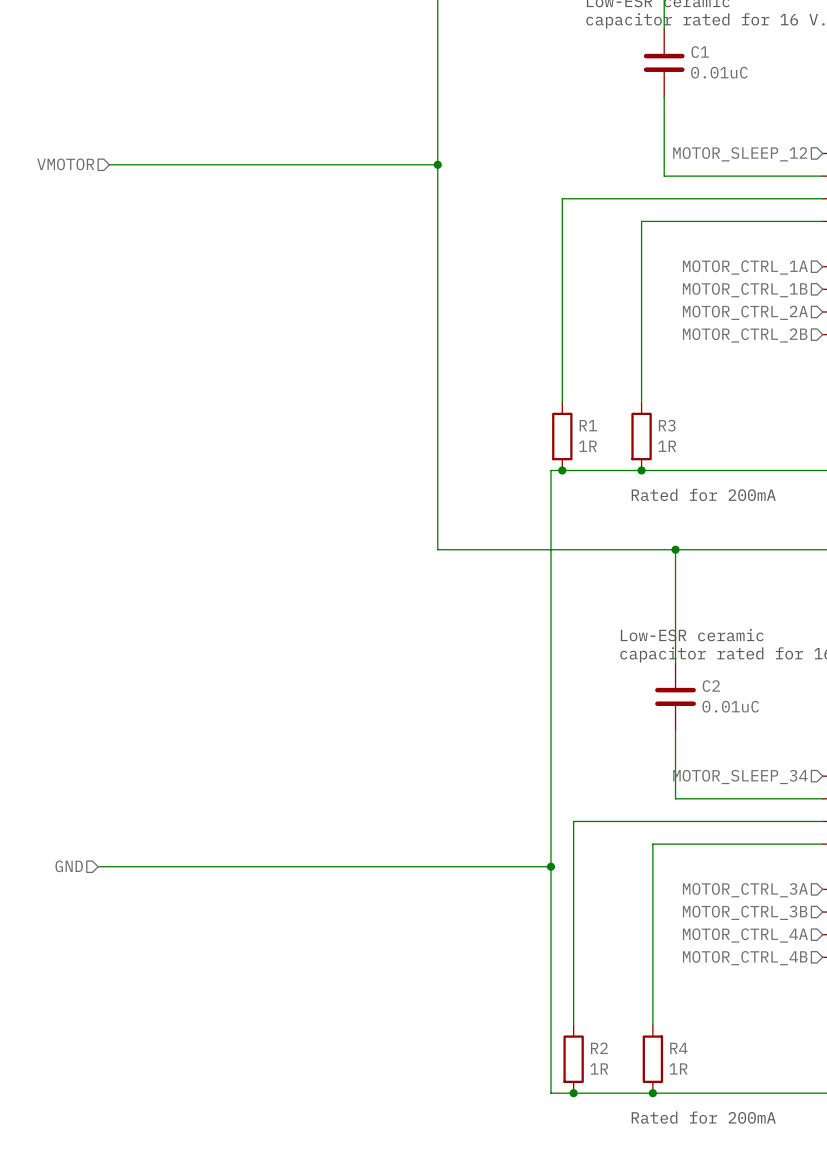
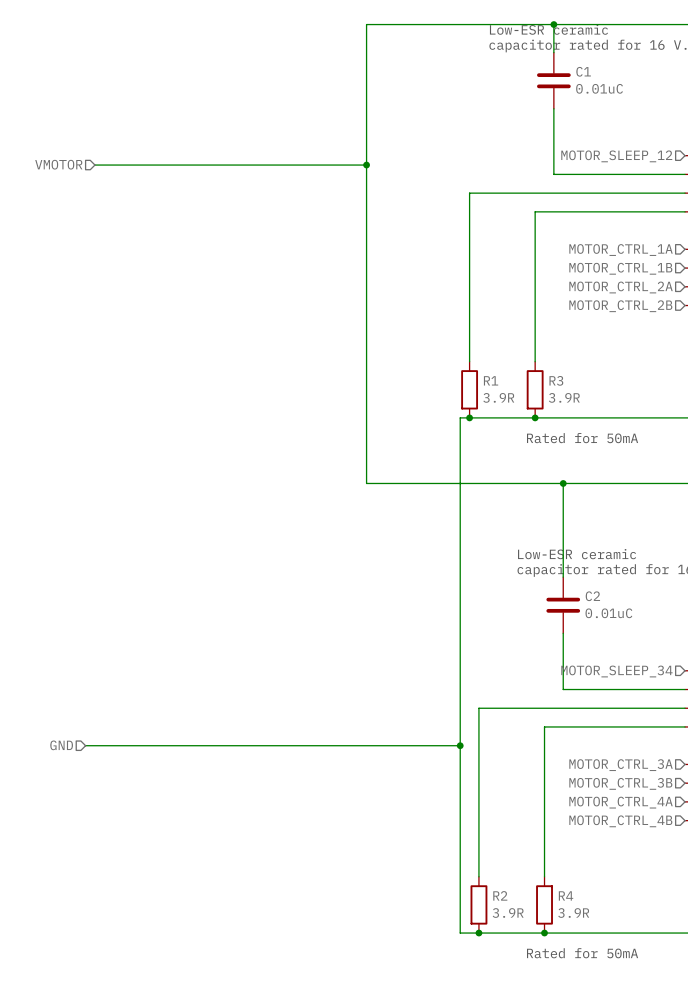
R1 value: 1R (587, 446) -> 3.9R (498, 397)
R3 value: 1R (667, 446) -> 3.9R (564, 397)
text: Rated for 200mA (703, 494) -> Rated for 50mA (582, 438)
R2 value: 1R (599, 1068) -> 3.9R (508, 913)
R4 value: 1R (678, 1068) -> 3.9R (573, 913)
text: Rated for 200mA (703, 1117) -> Rated for 50mA (582, 953)

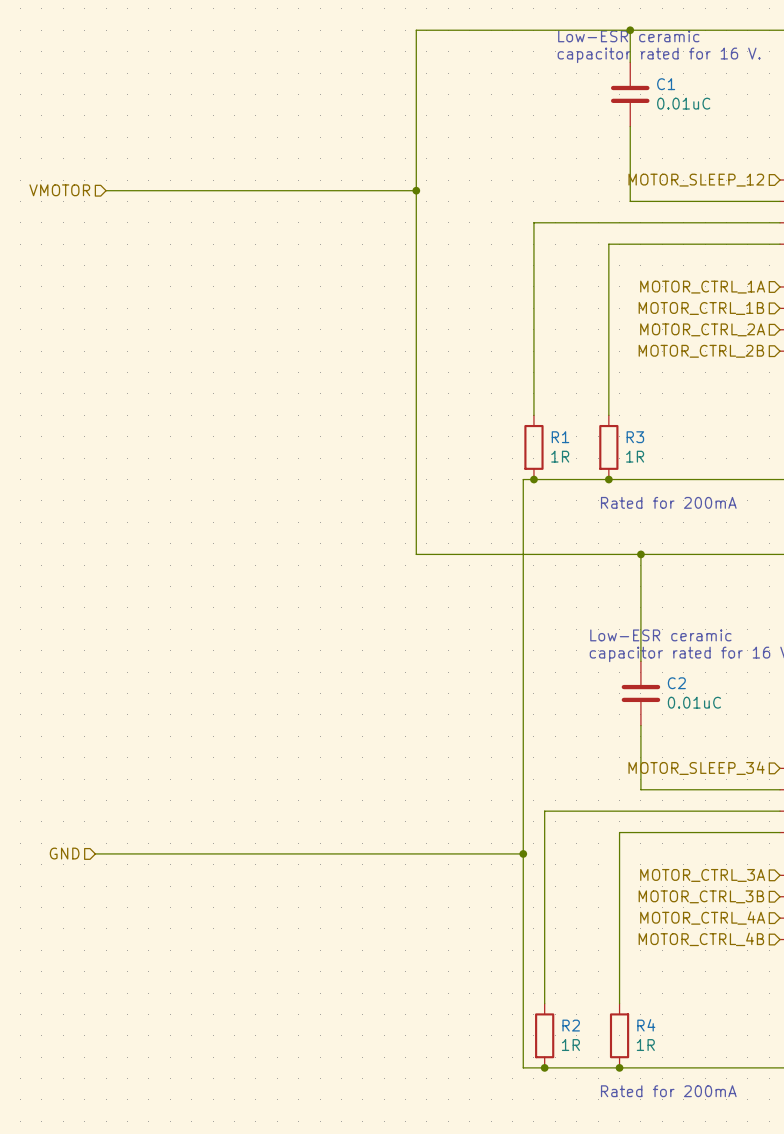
R1 value: 3.9R (498, 397) -> 1R (560, 456)
R3 value: 3.9R (564, 397) -> 1R (635, 456)
text: Rated for 50mA (582, 438) -> Rated for 200mA (668, 502)
R2 value: 3.9R (508, 913) -> 1R (570, 1045)
R4 value: 3.9R (573, 913) -> 1R (645, 1045)
text: Rated for 50mA (582, 953) -> Rated for 200mA (668, 1091)

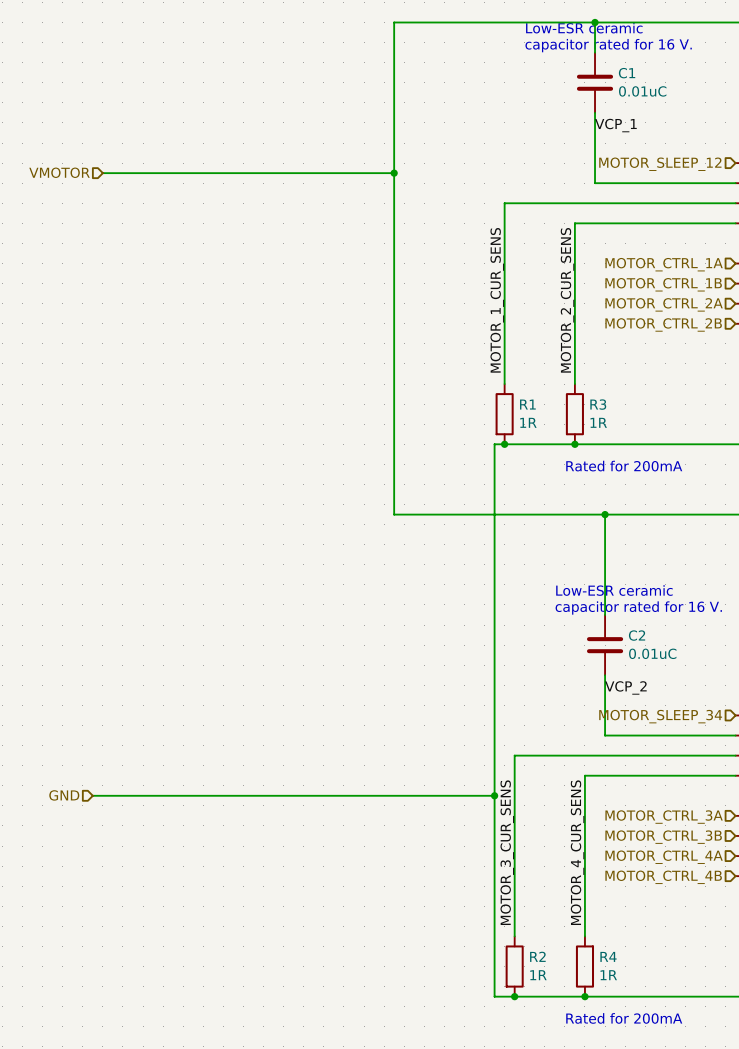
label: none -> VCP_1 (615, 125)
label: none -> MOTOR_1_CUR_SENS (497, 300)
label: none -> MOTOR_2_CUR_SENS (567, 300)
label: none -> VCP_2 (625, 687)
label: none -> MOTOR_3_CUR_SENS (507, 852)
label: none -> MOTOR_4_CUR_SENS (577, 852)

